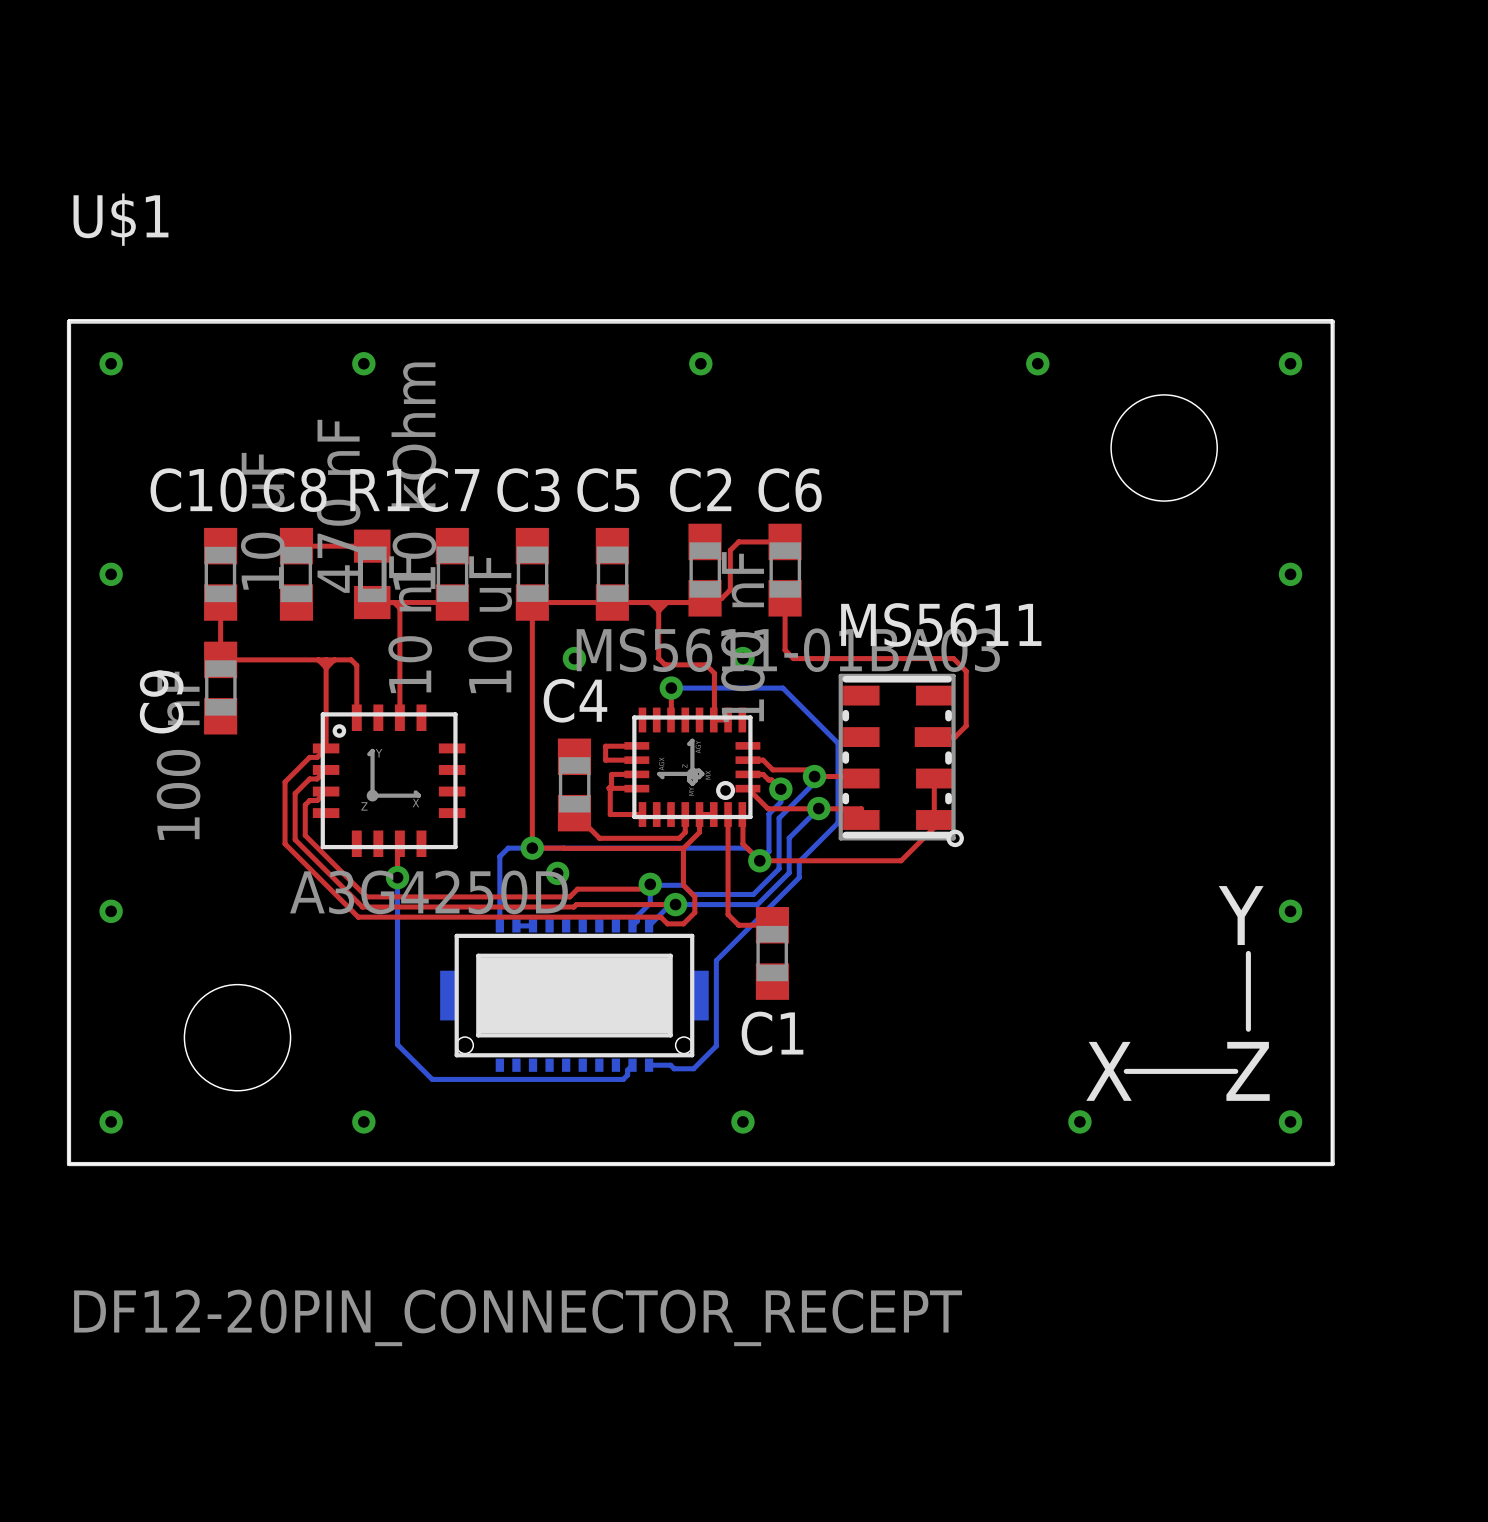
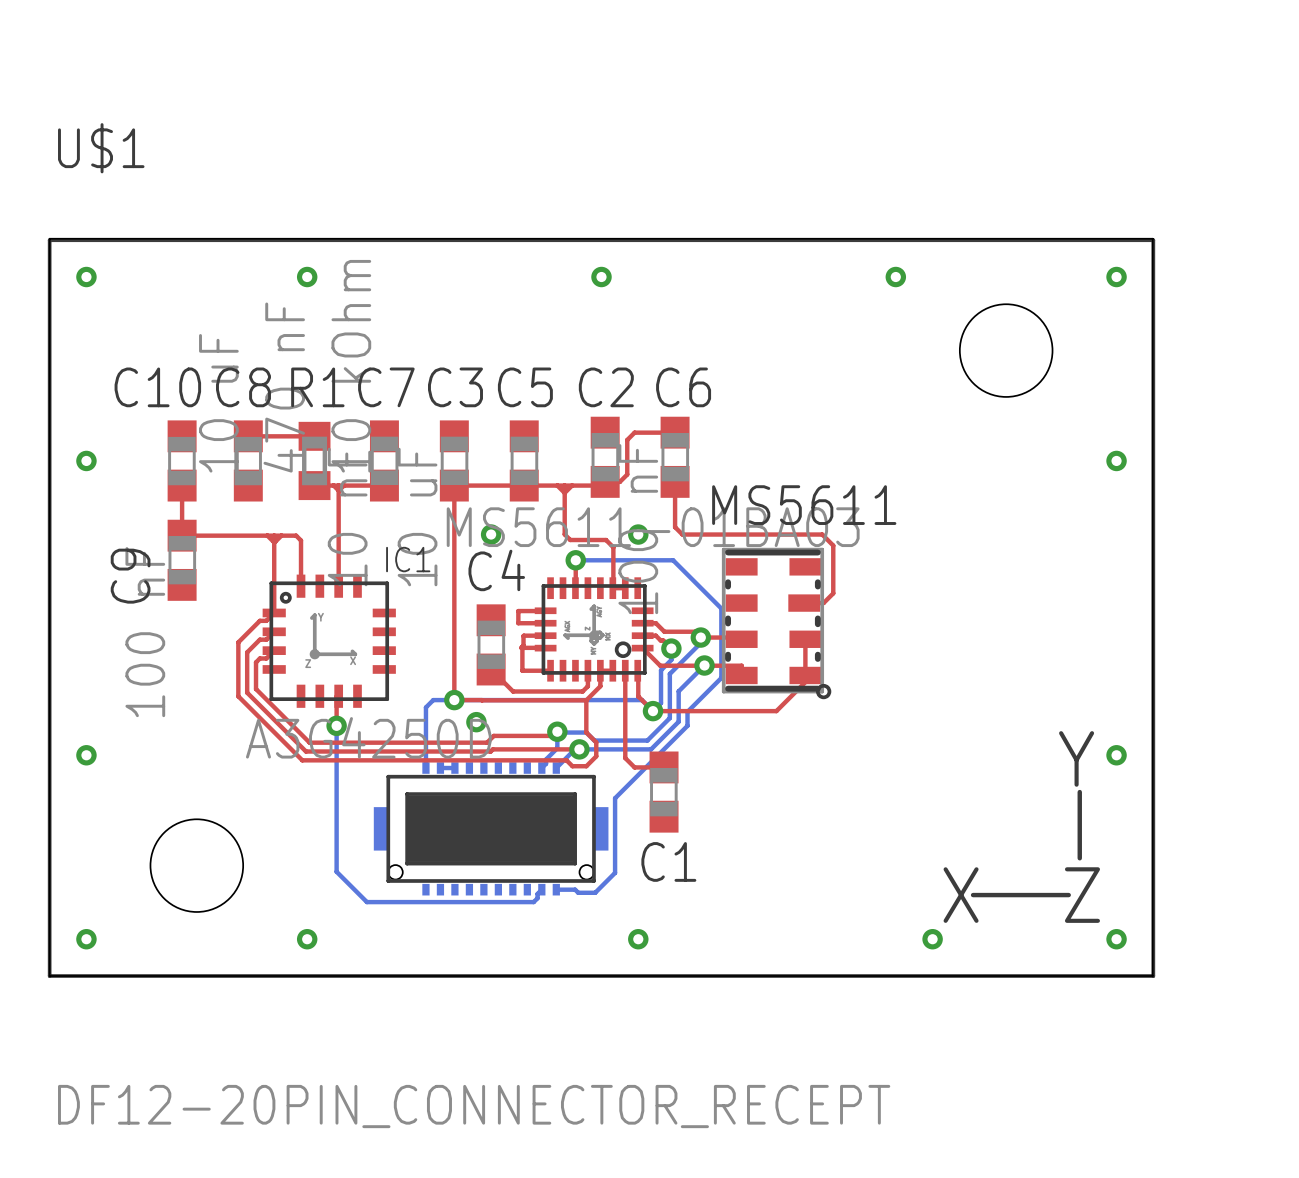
text: none -> IC1 (408, 559)

